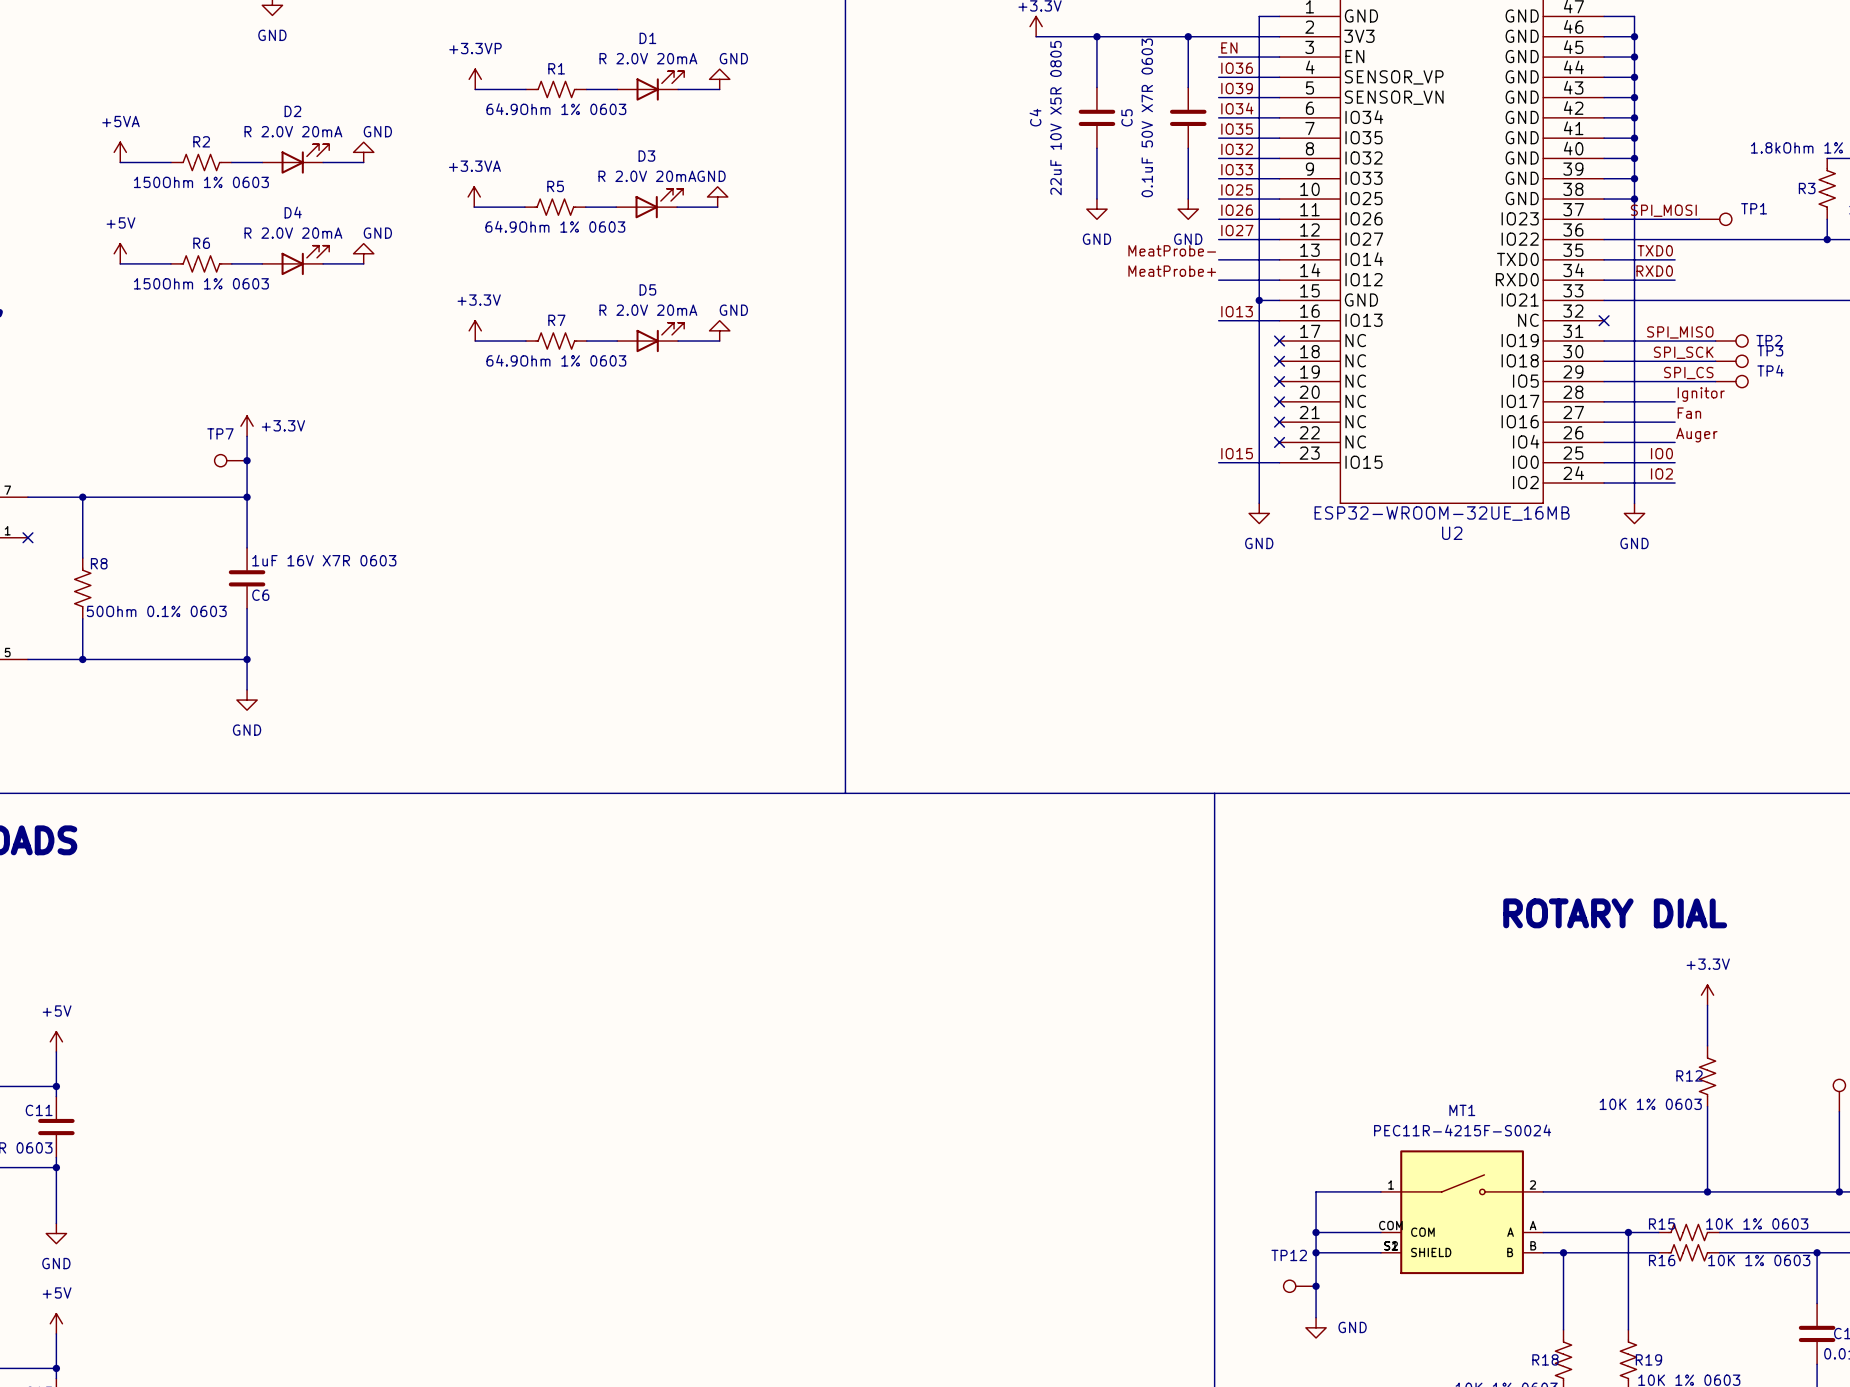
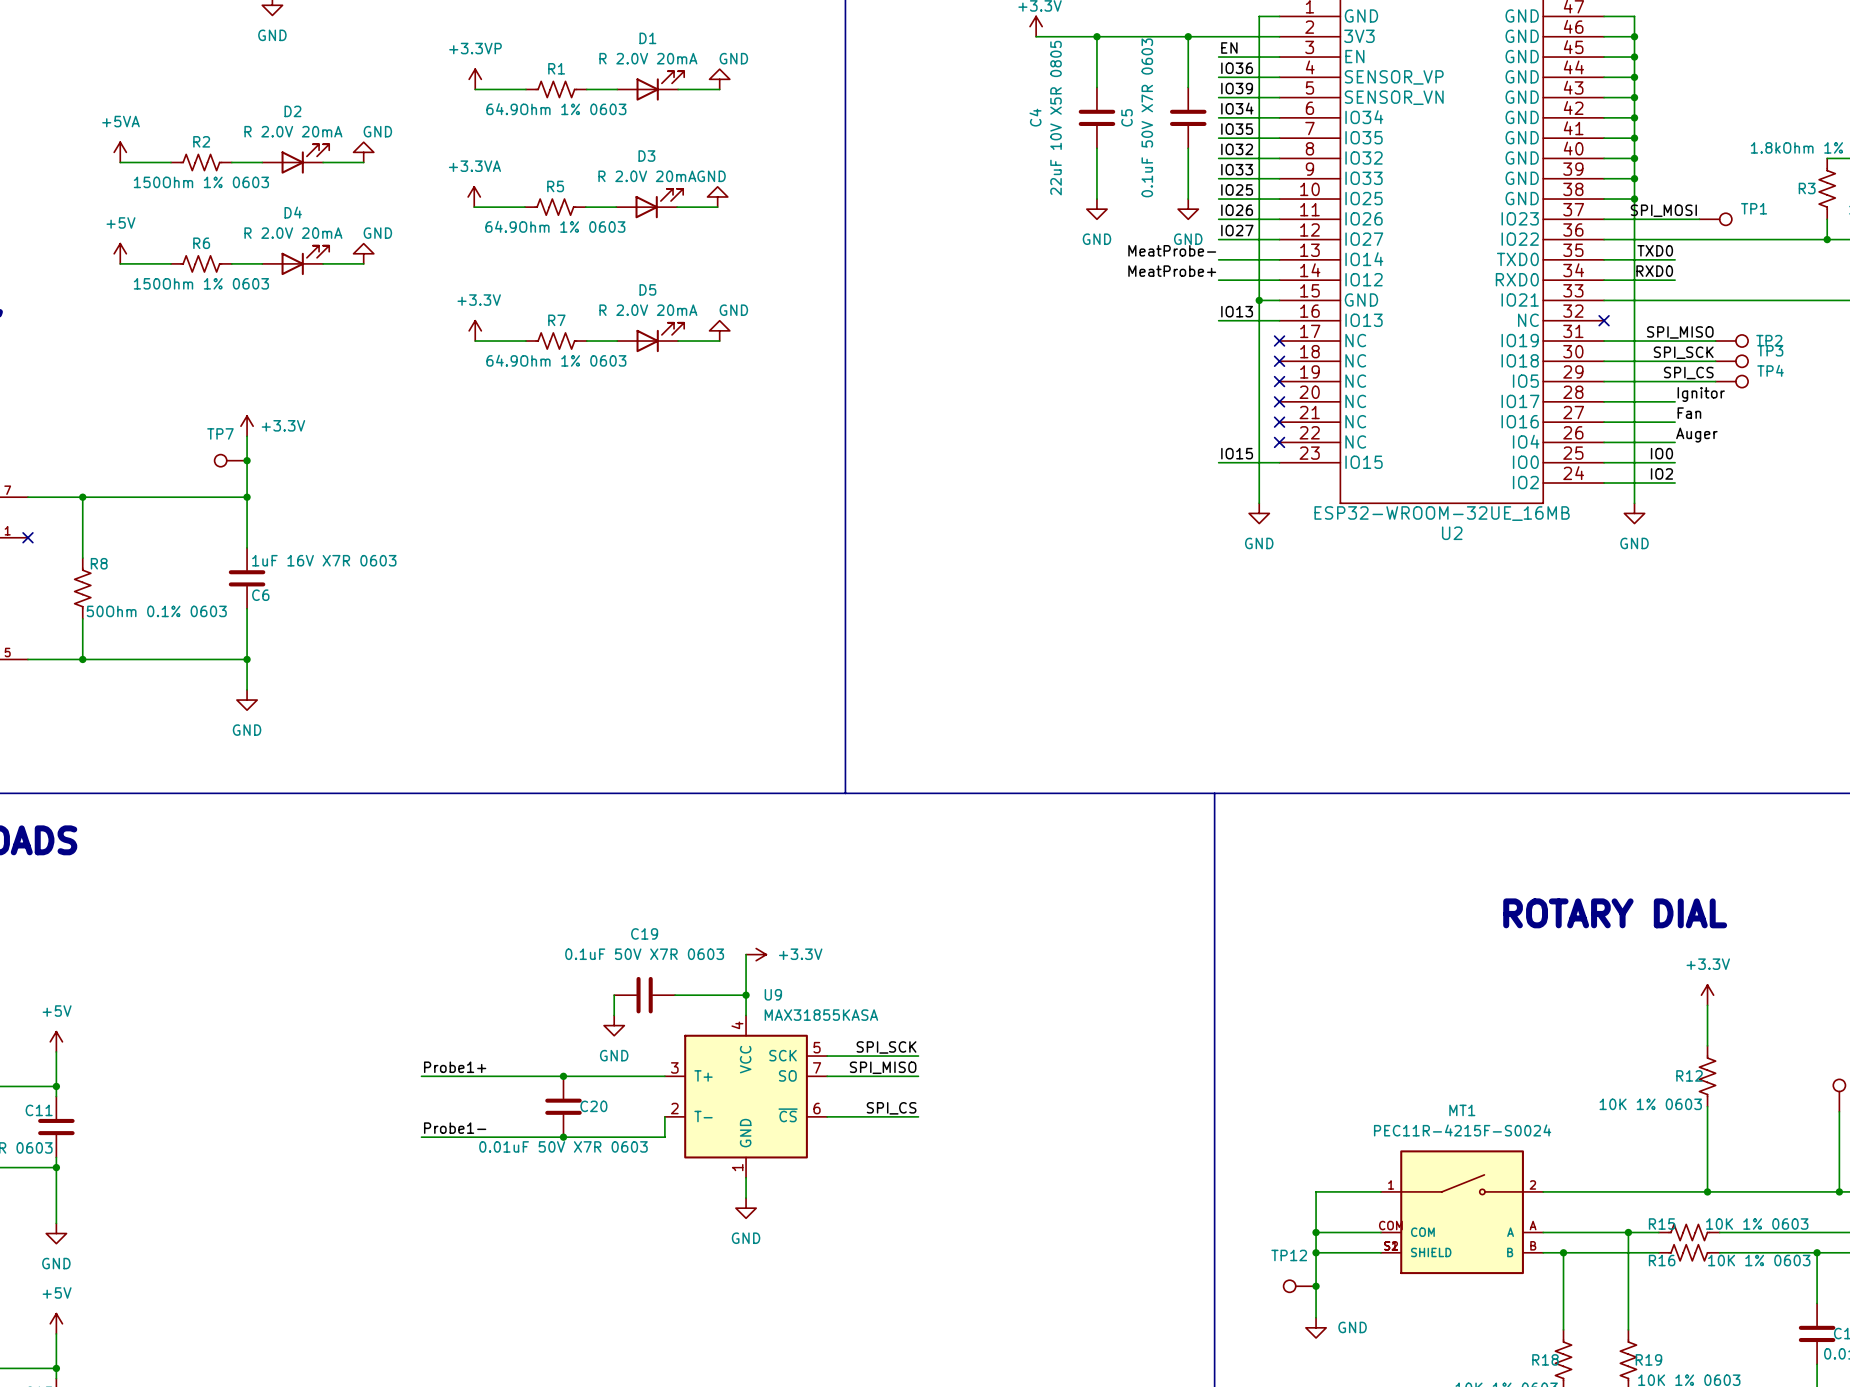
wire: none -> (746, 954) (746, 1015)
power symbol: none -> +3.3V (756, 954)
wire: none -> (614, 995) (614, 1015)
C19: none -> 0.1uF 50V X7R 0603 (644, 995)
wire: none -> (675, 995) (746, 995)
junction: none -> (746, 995)
power symbol: none -> GND (614, 1025)
label: none -> SPI_SCK (886, 1047)
wire: none -> (827, 1056) (918, 1056)
label: none -> Probe1+ (455, 1067)
label: none -> SPI_MISO (883, 1067)
wire: none -> (421, 1076) (664, 1076)
junction: none -> (563, 1076)
wire: none -> (827, 1076) (918, 1076)
U9: none -> MAX31855KASA (746, 1096)
C20: none -> 0.01uF 50V X7R 0603 (563, 1106)
label: none -> SPI_CS (891, 1108)
wire: none -> (664, 1116) (664, 1137) (421, 1137)
wire: none -> (827, 1116) (918, 1116)
label: none -> Probe1- (455, 1128)
junction: none -> (563, 1137)
wire: none -> (746, 1177) (746, 1198)
power symbol: none -> GND (746, 1208)

